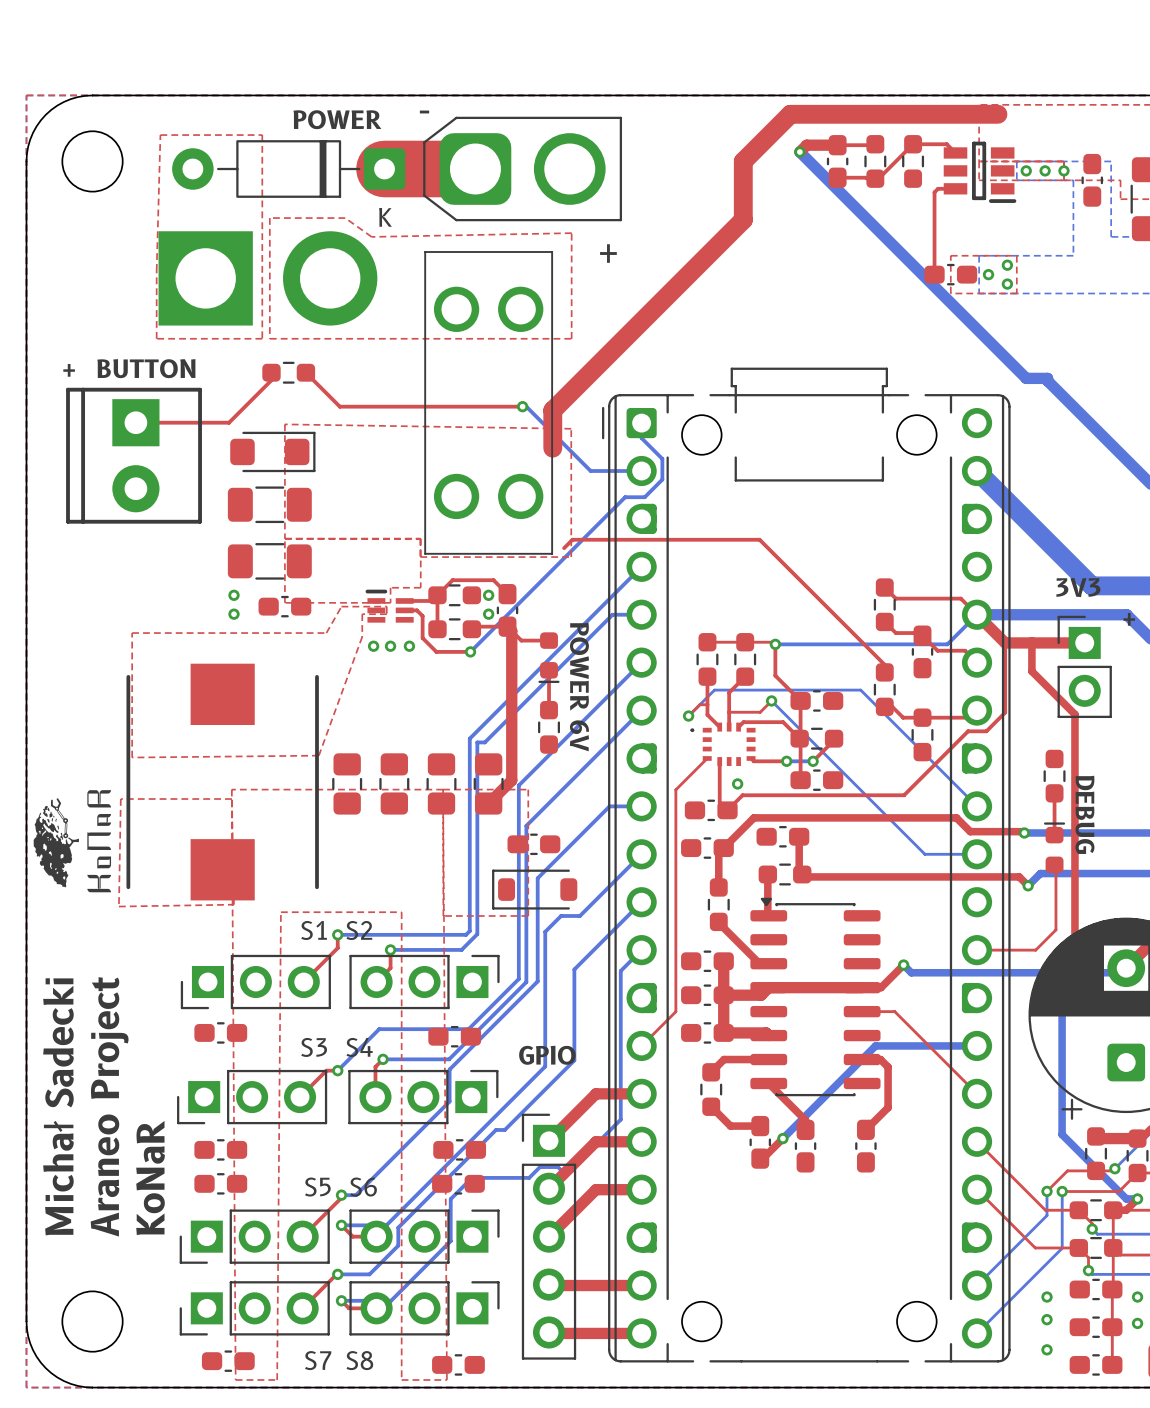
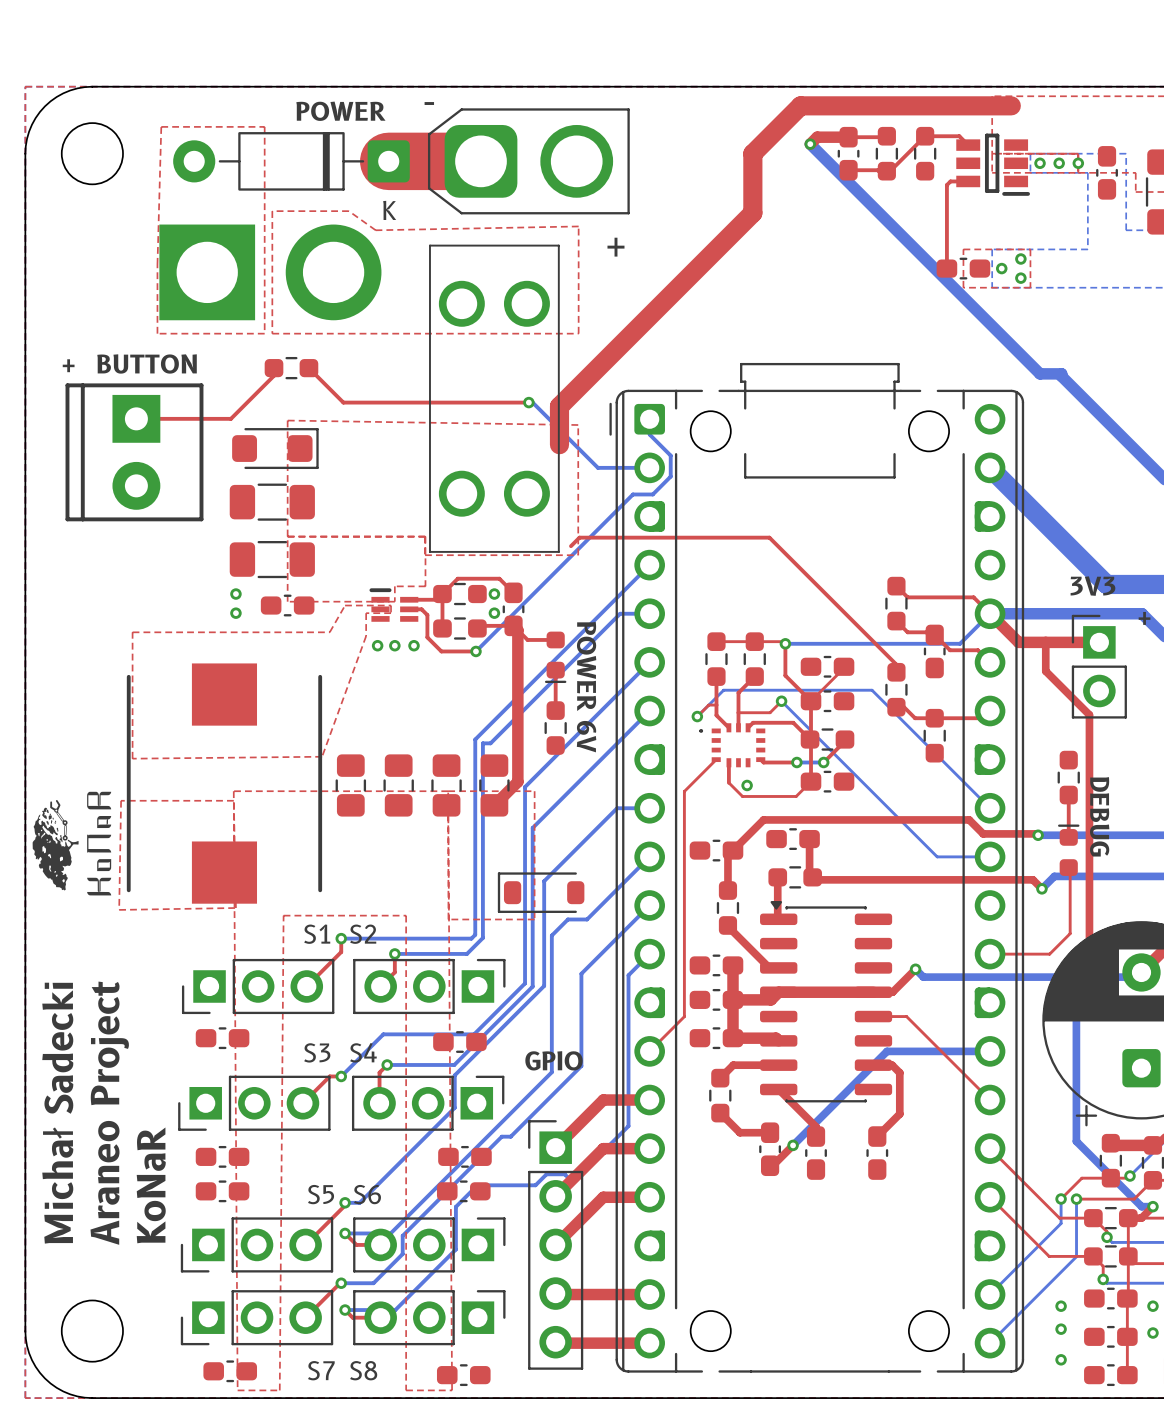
top track: (1005, 642) (1005, 712) (986, 731) (968, 731) (904, 795) (742, 795) (727, 810) (719, 802) (719, 781) -> (811, 781) (796, 796) (742, 796) (728, 782)
part: none -> (827, 666)
top track: none -> (844, 666) (811, 701)
part: (711, 810) -> none
part: (533, 844) -> none

